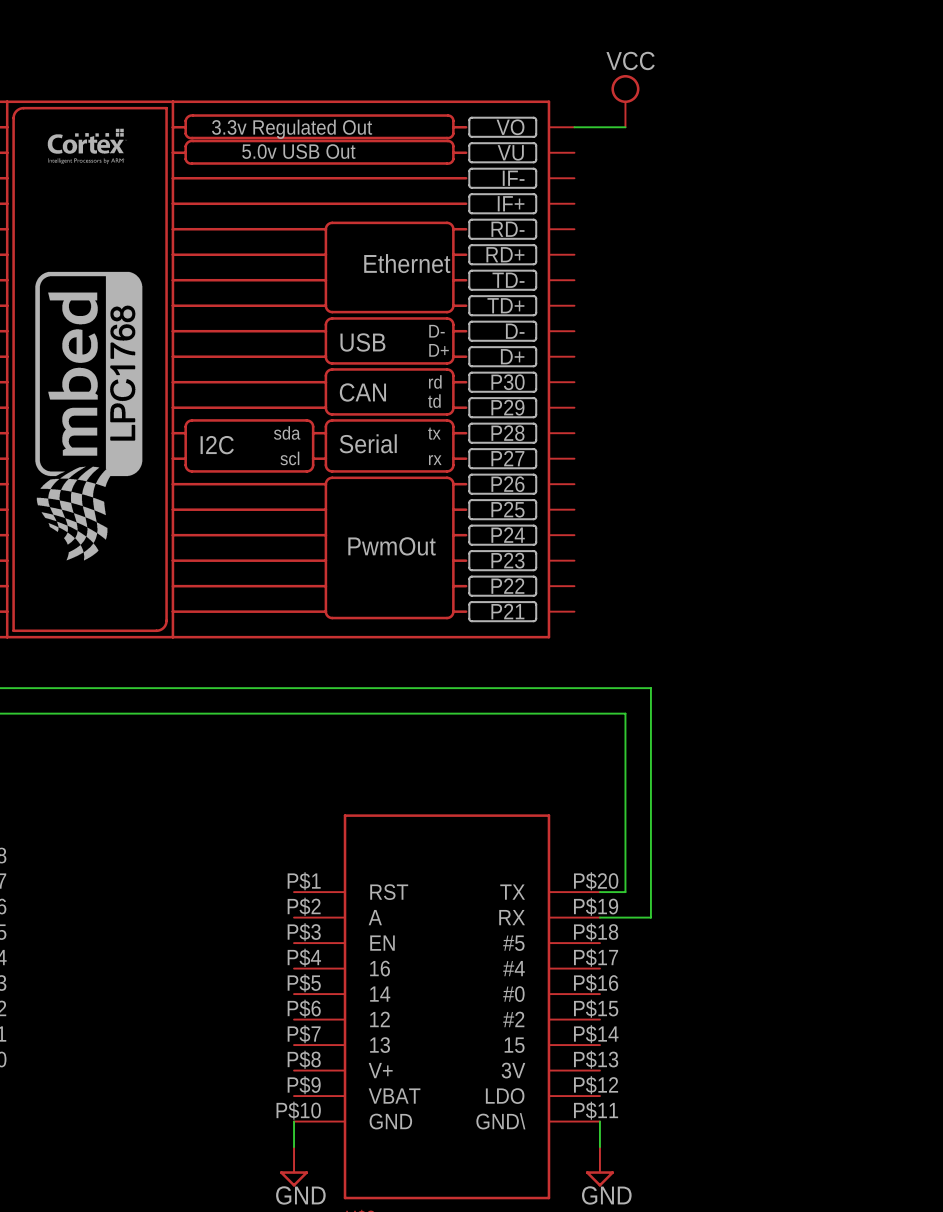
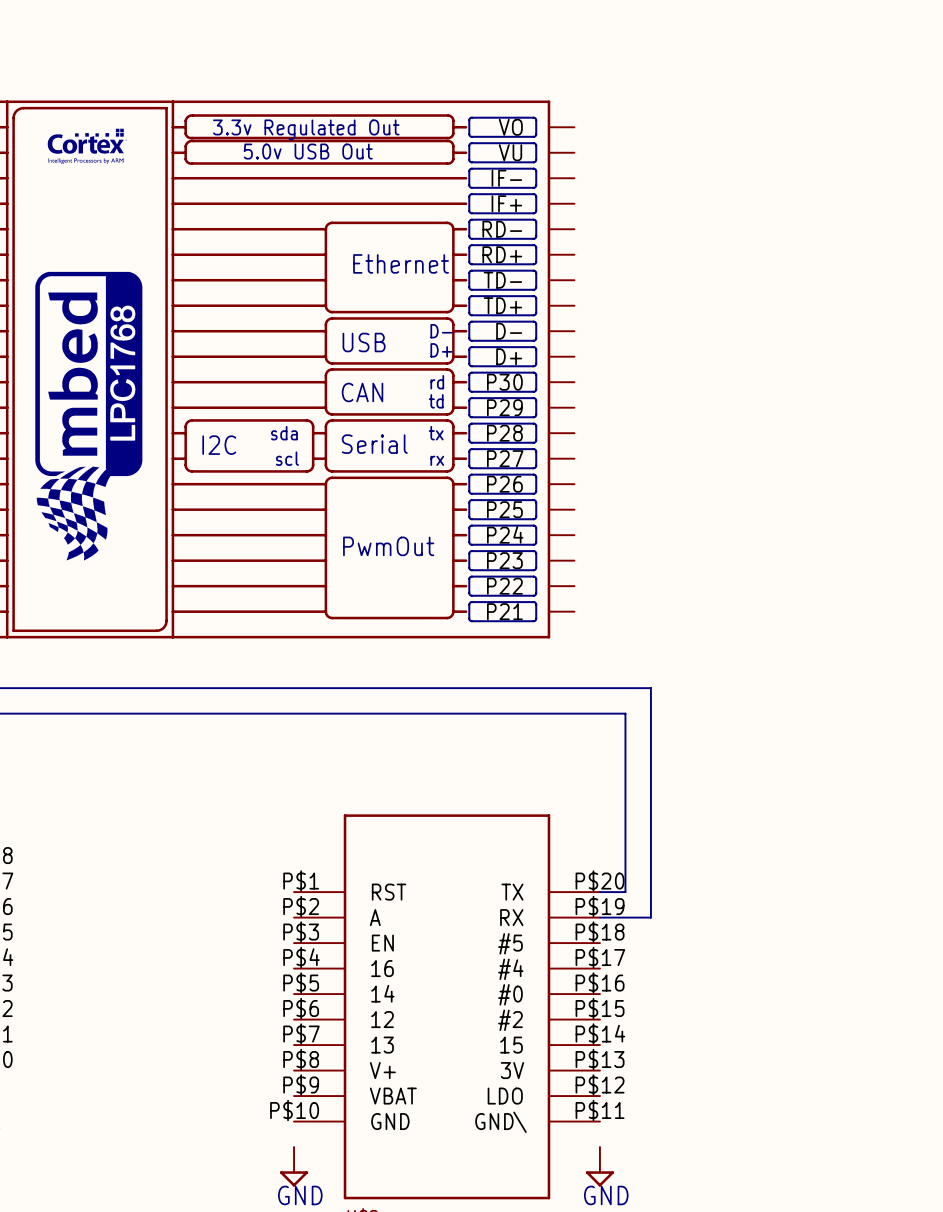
power symbol: VCC (625, 101) -> none
wire: (574, 127) (625, 127) -> none
wire: (294, 1121) (294, 1147) -> none
wire: (599, 1121) (599, 1147) -> none

